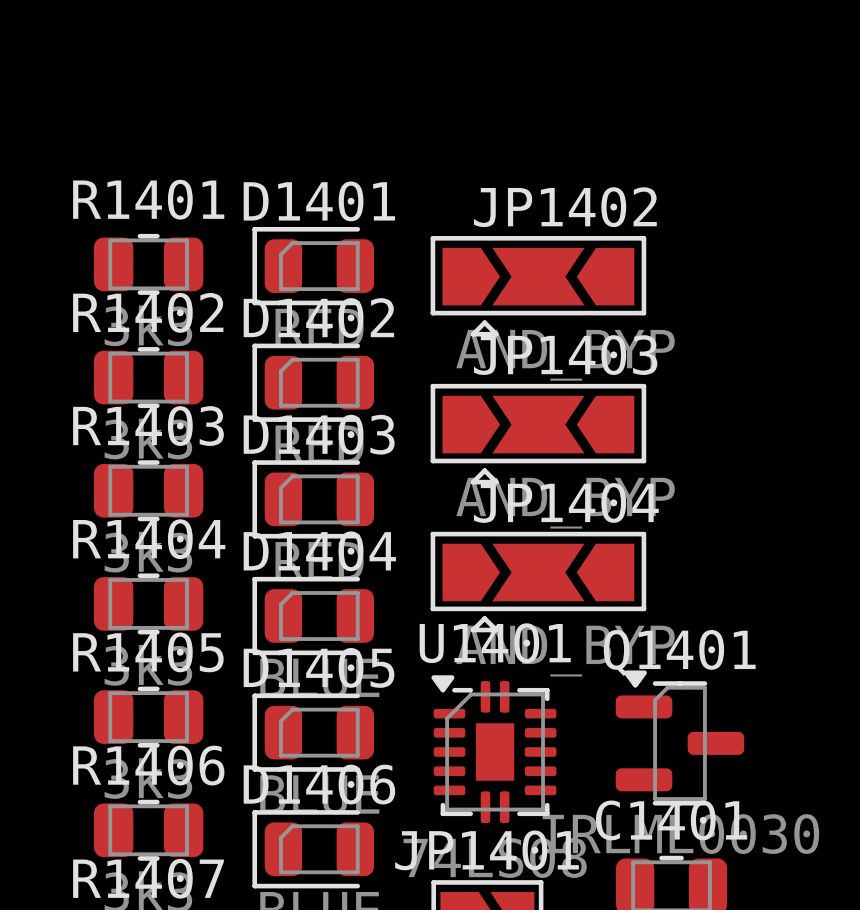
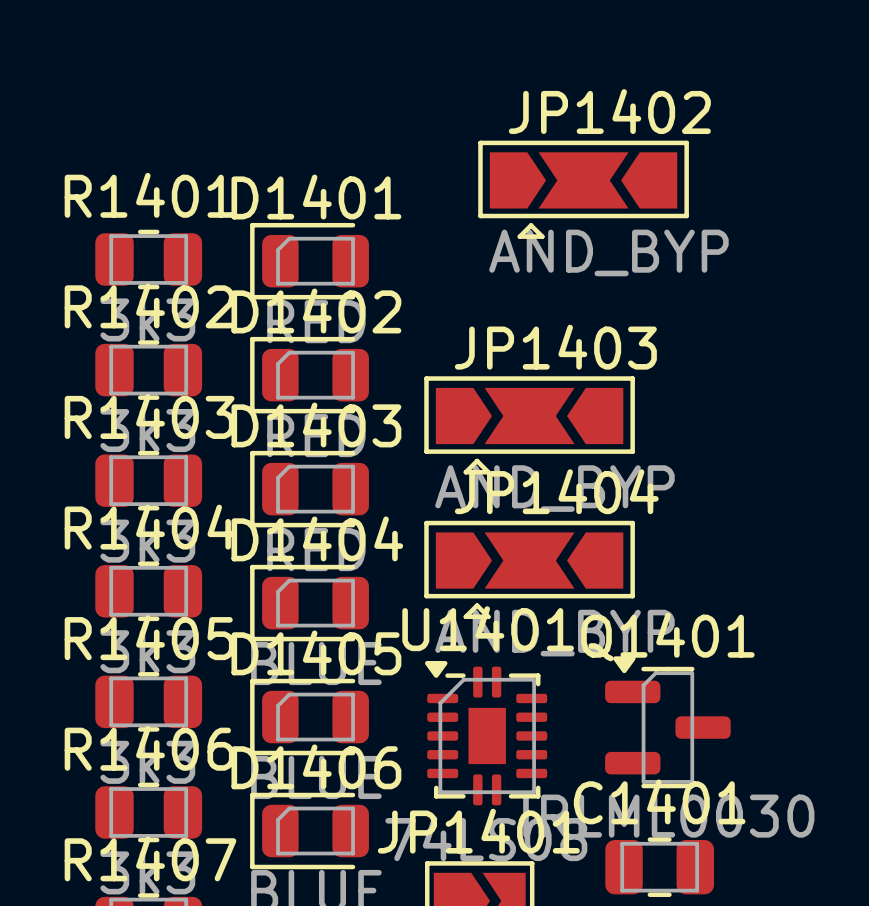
JP1402 position: (538, 286) -> (583, 189)

